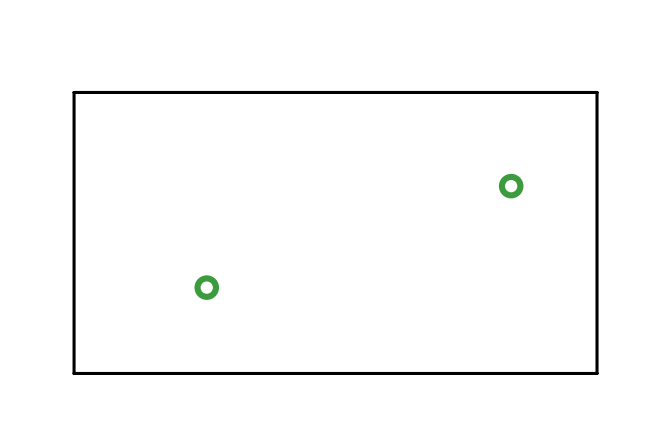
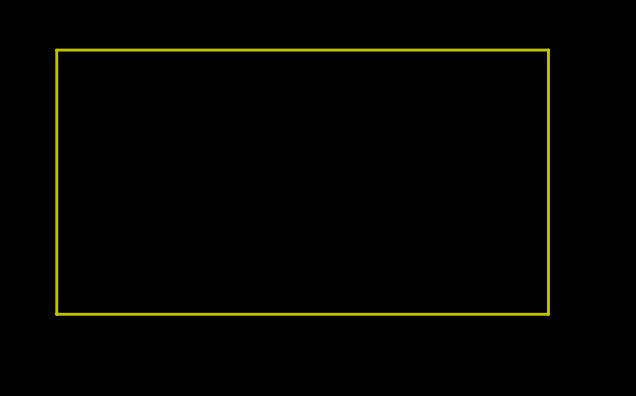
via: (511, 186) -> none
via: (206, 287) -> none

